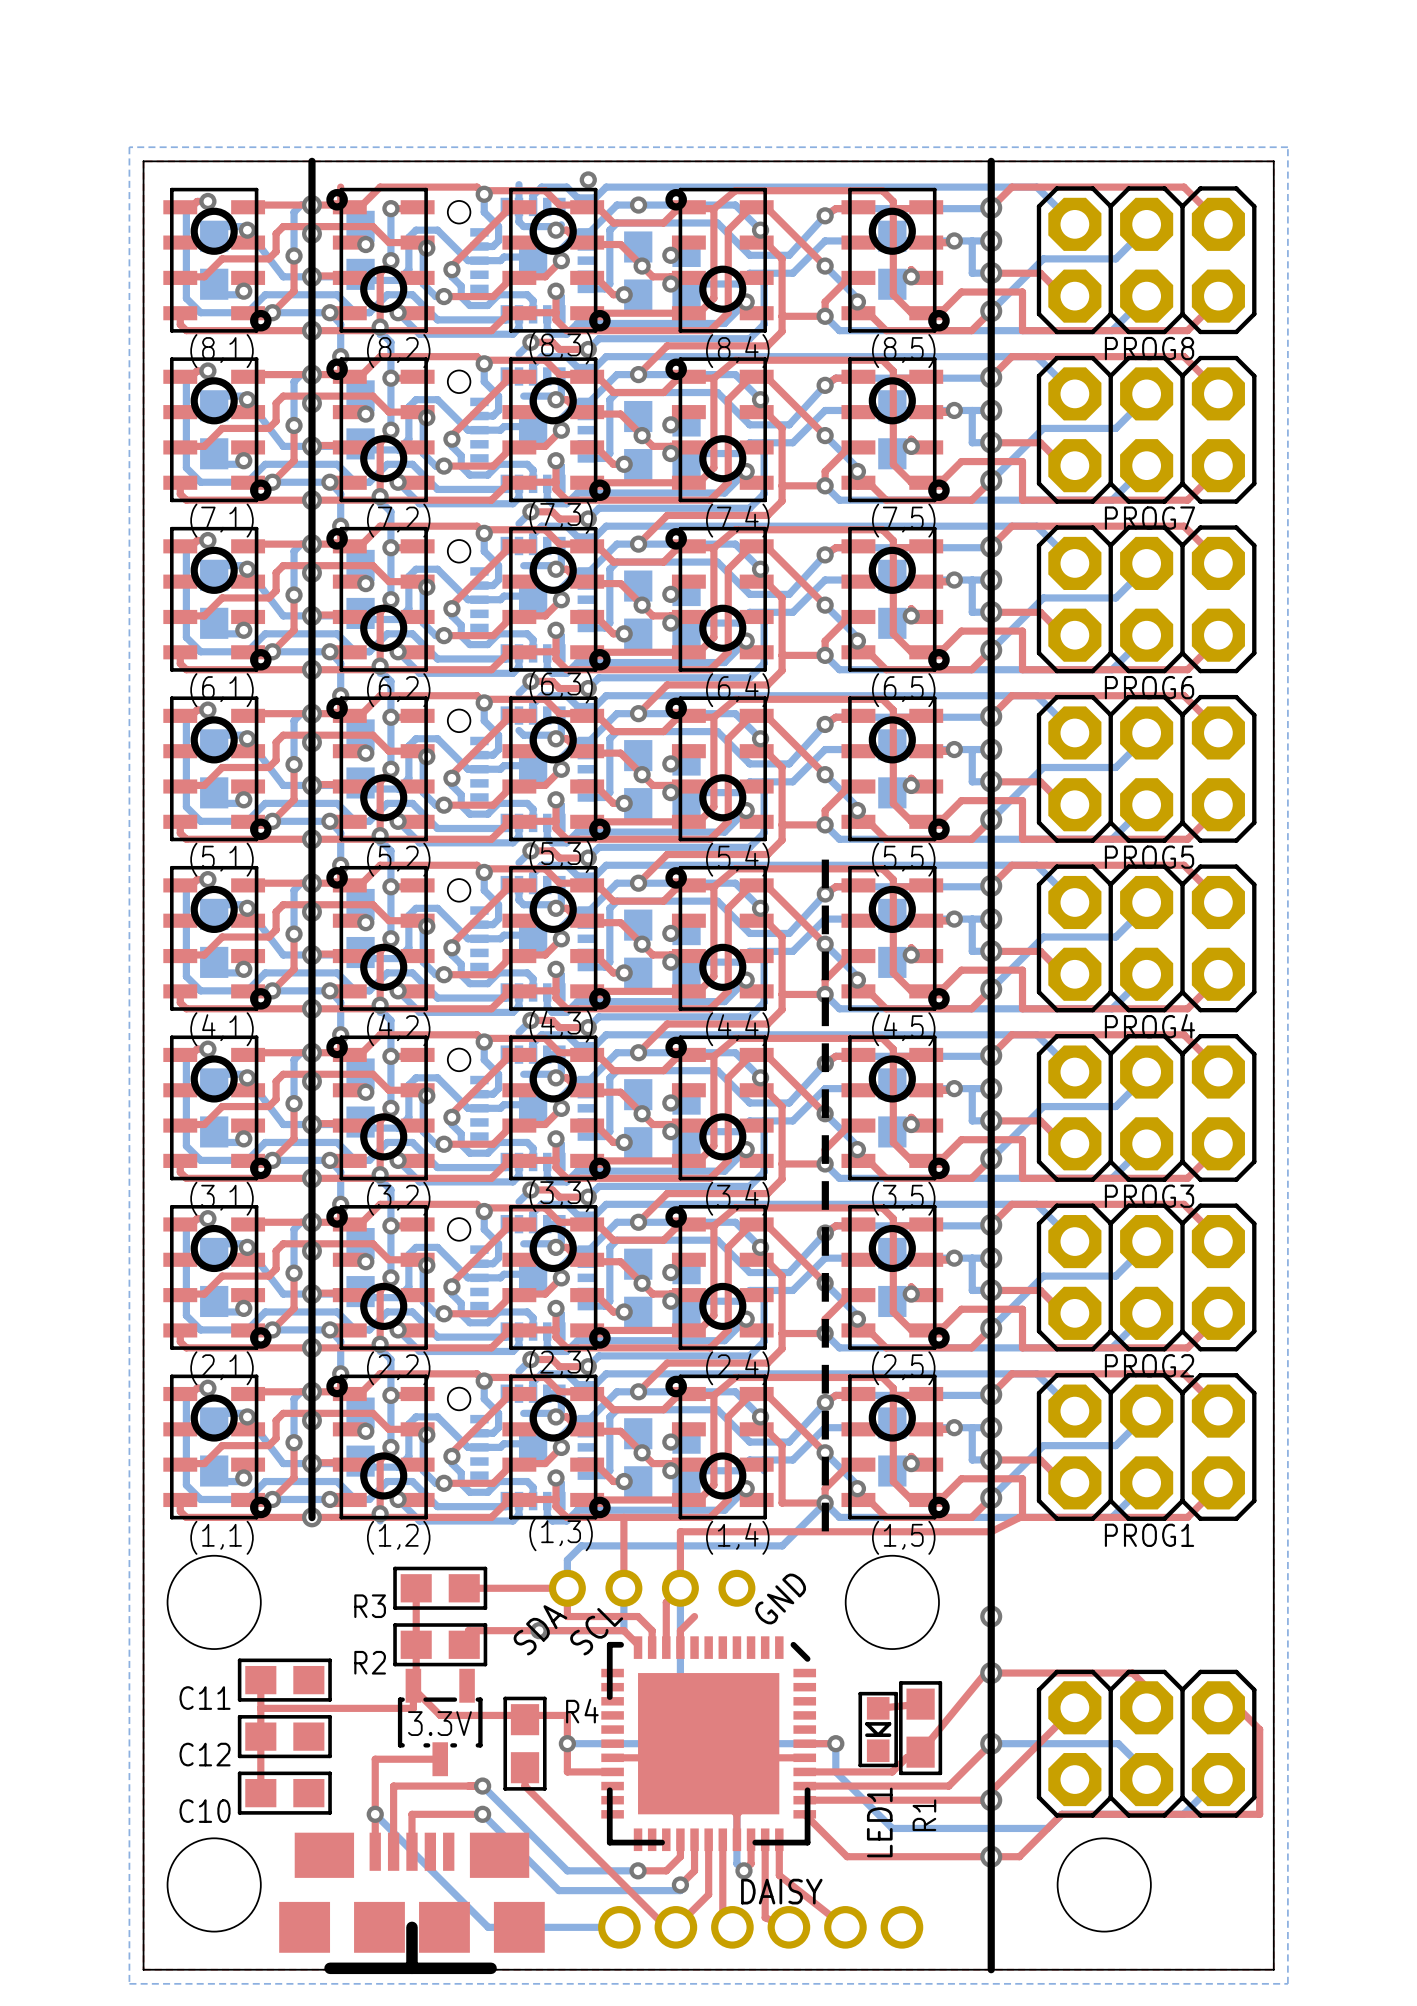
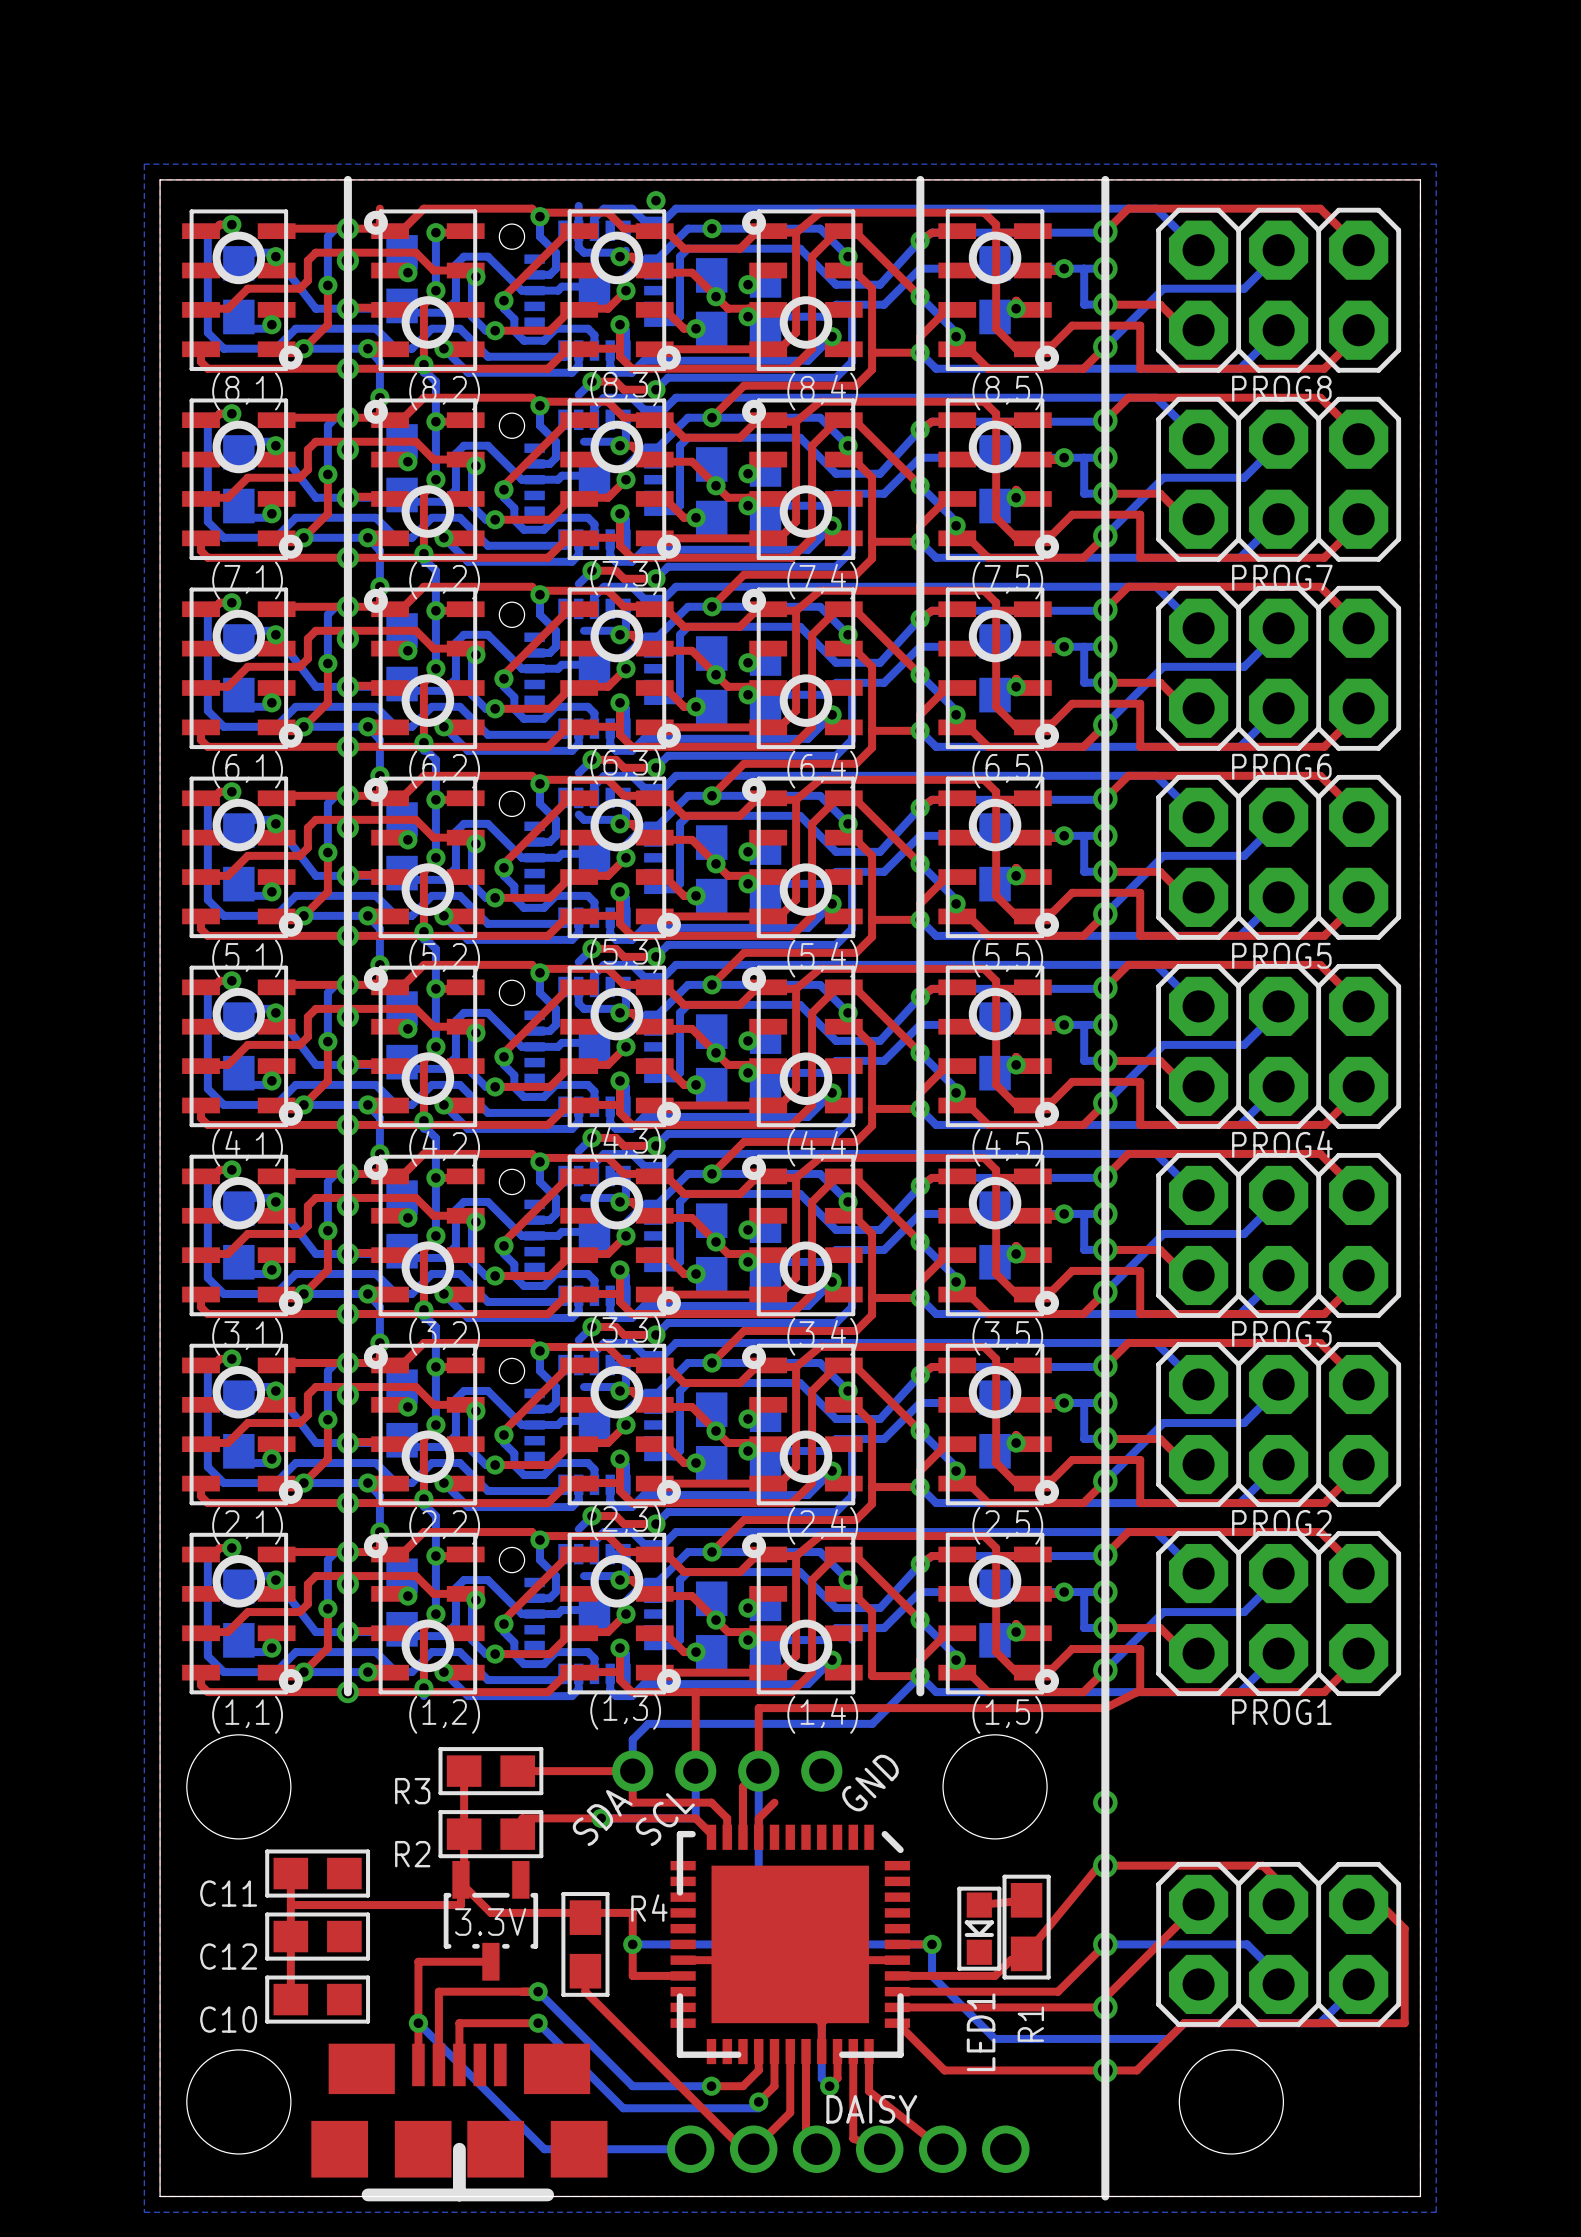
line: none -> (920, 179) (920, 1692)
line: (825, 859) (825, 1545) -> none

